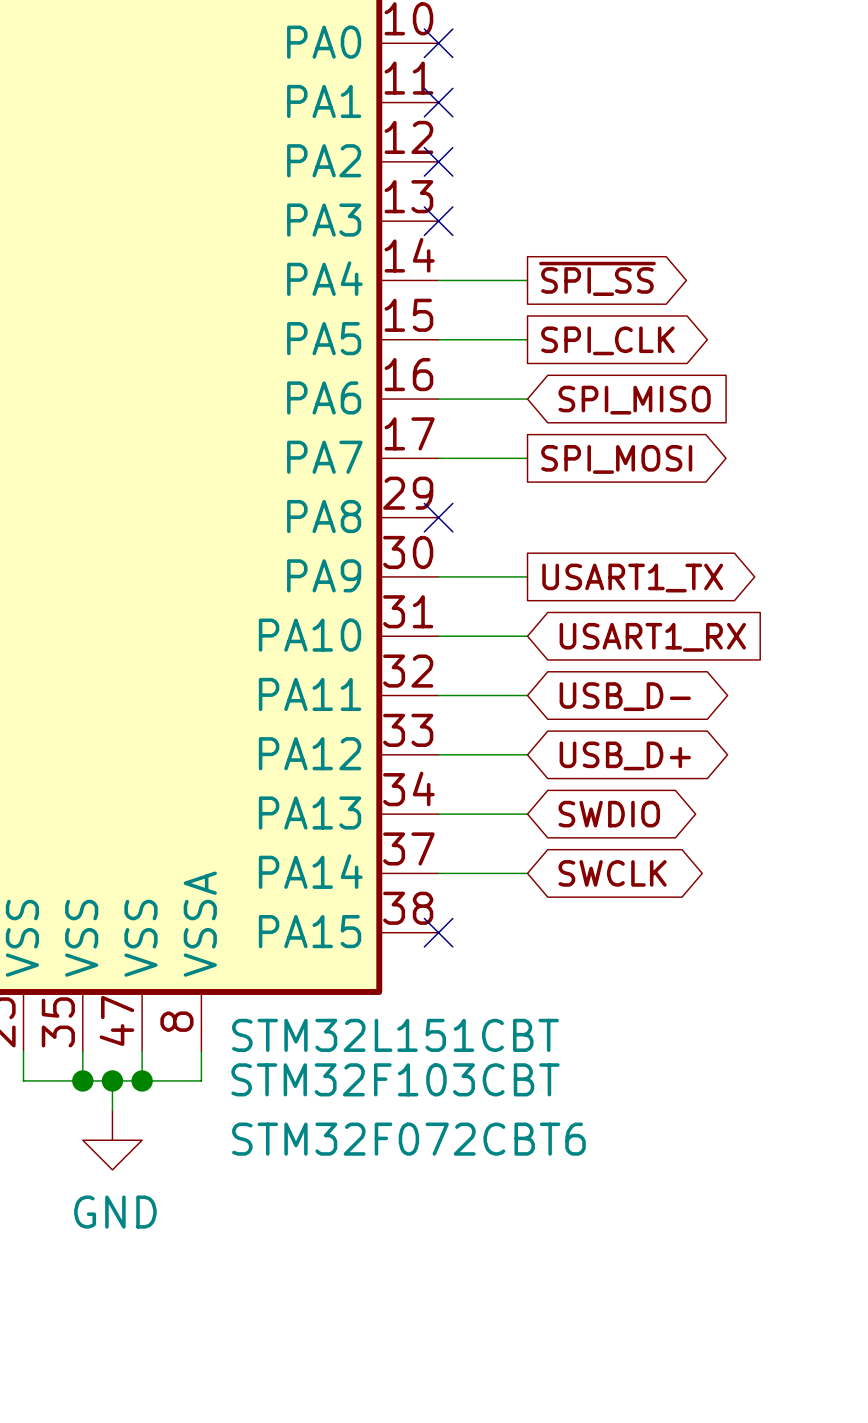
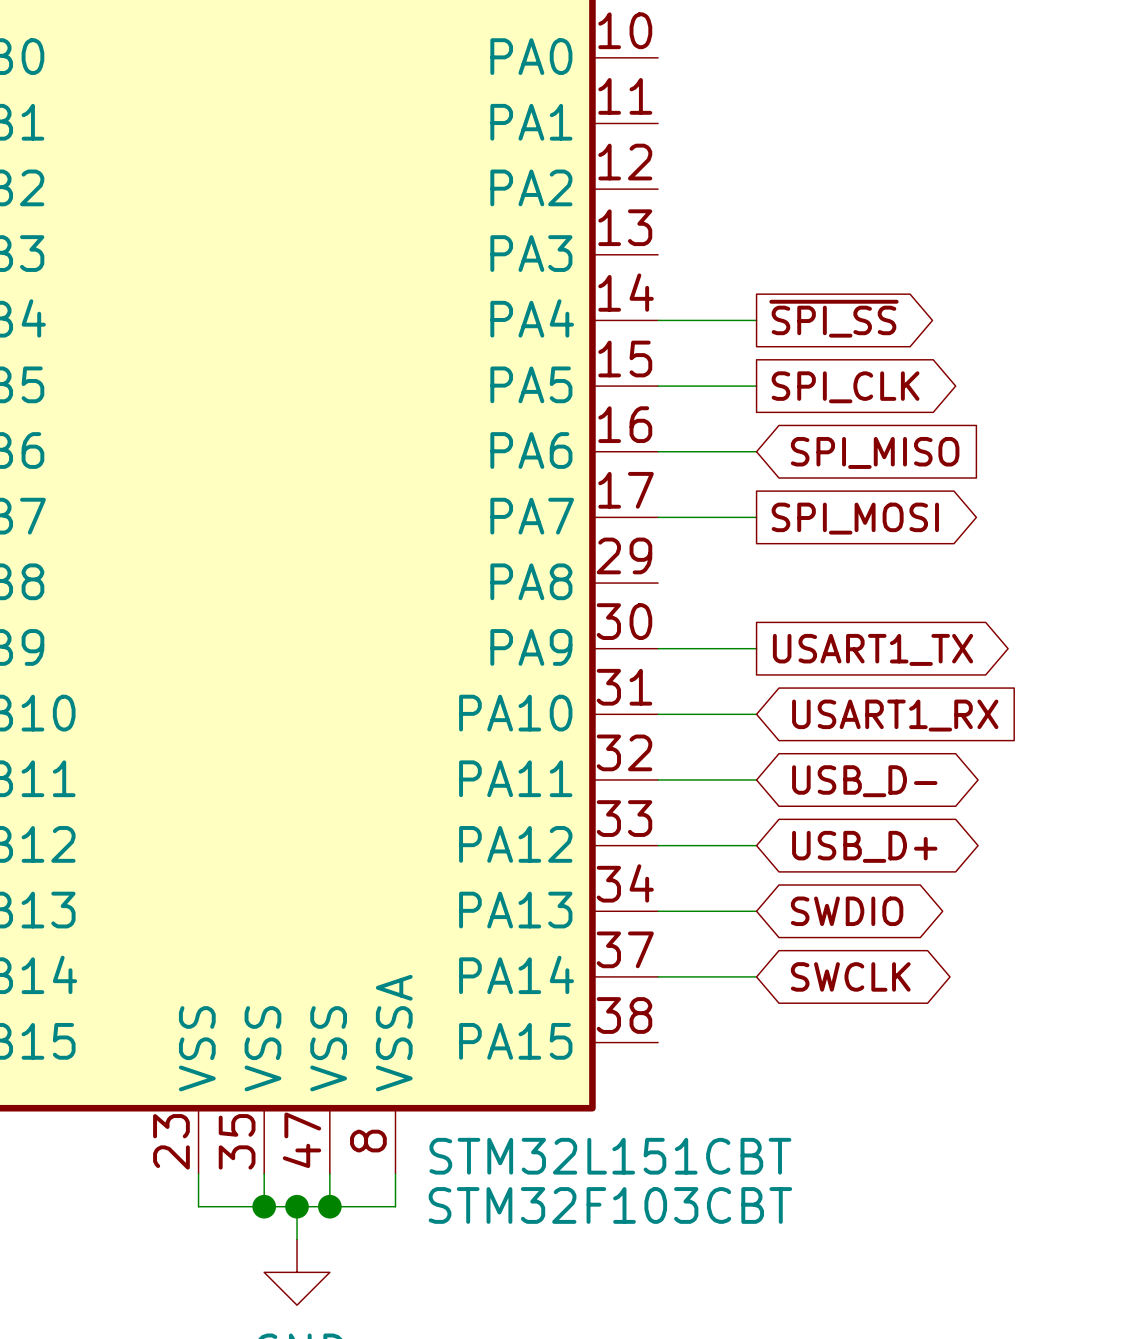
no-connect mark: (438, 43) -> none
no-connect mark: (438, 102) -> none
no-connect mark: (438, 161) -> none
no-connect mark: (438, 221) -> none
no-connect mark: (438, 517) -> none
no-connect mark: (438, 932) -> none
part text: STM32F072CBT6 (408, 1139) -> none

